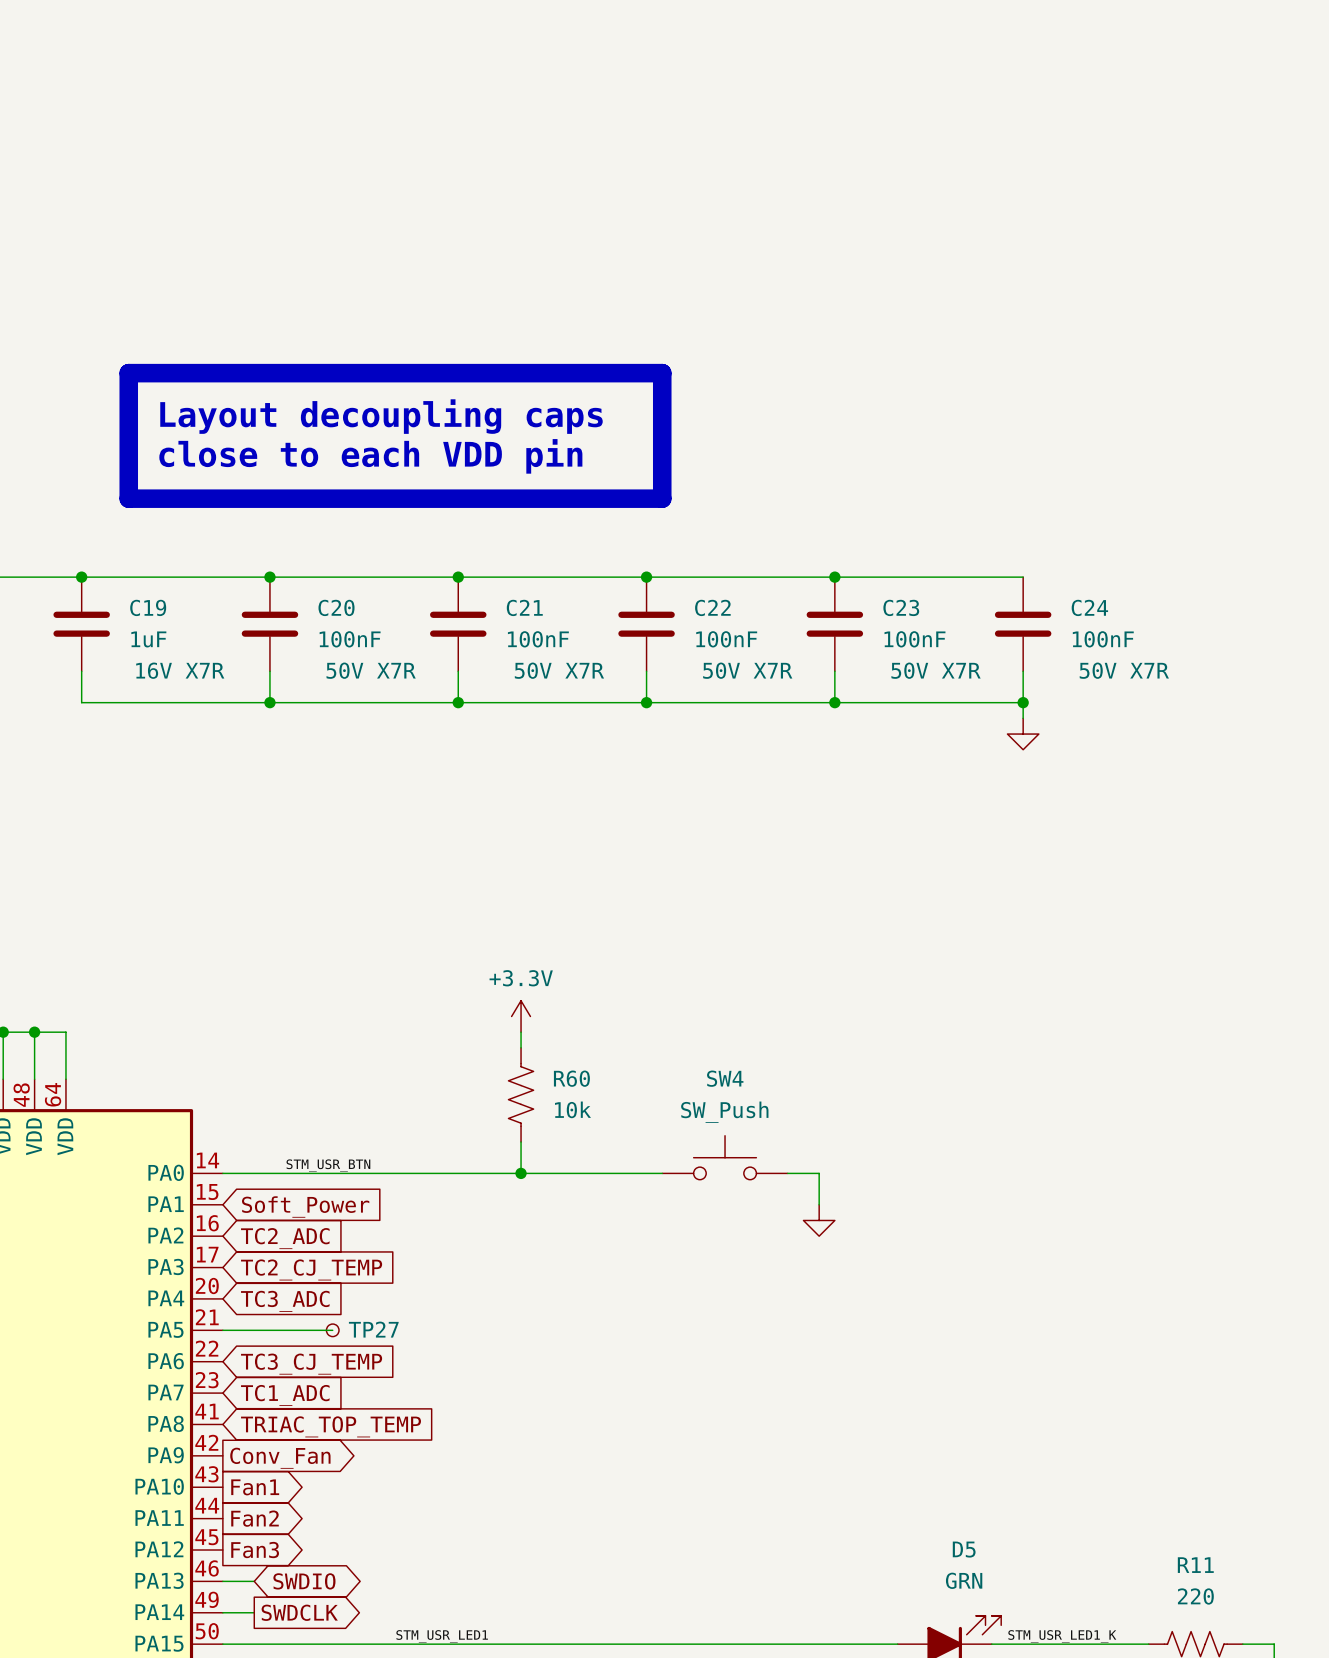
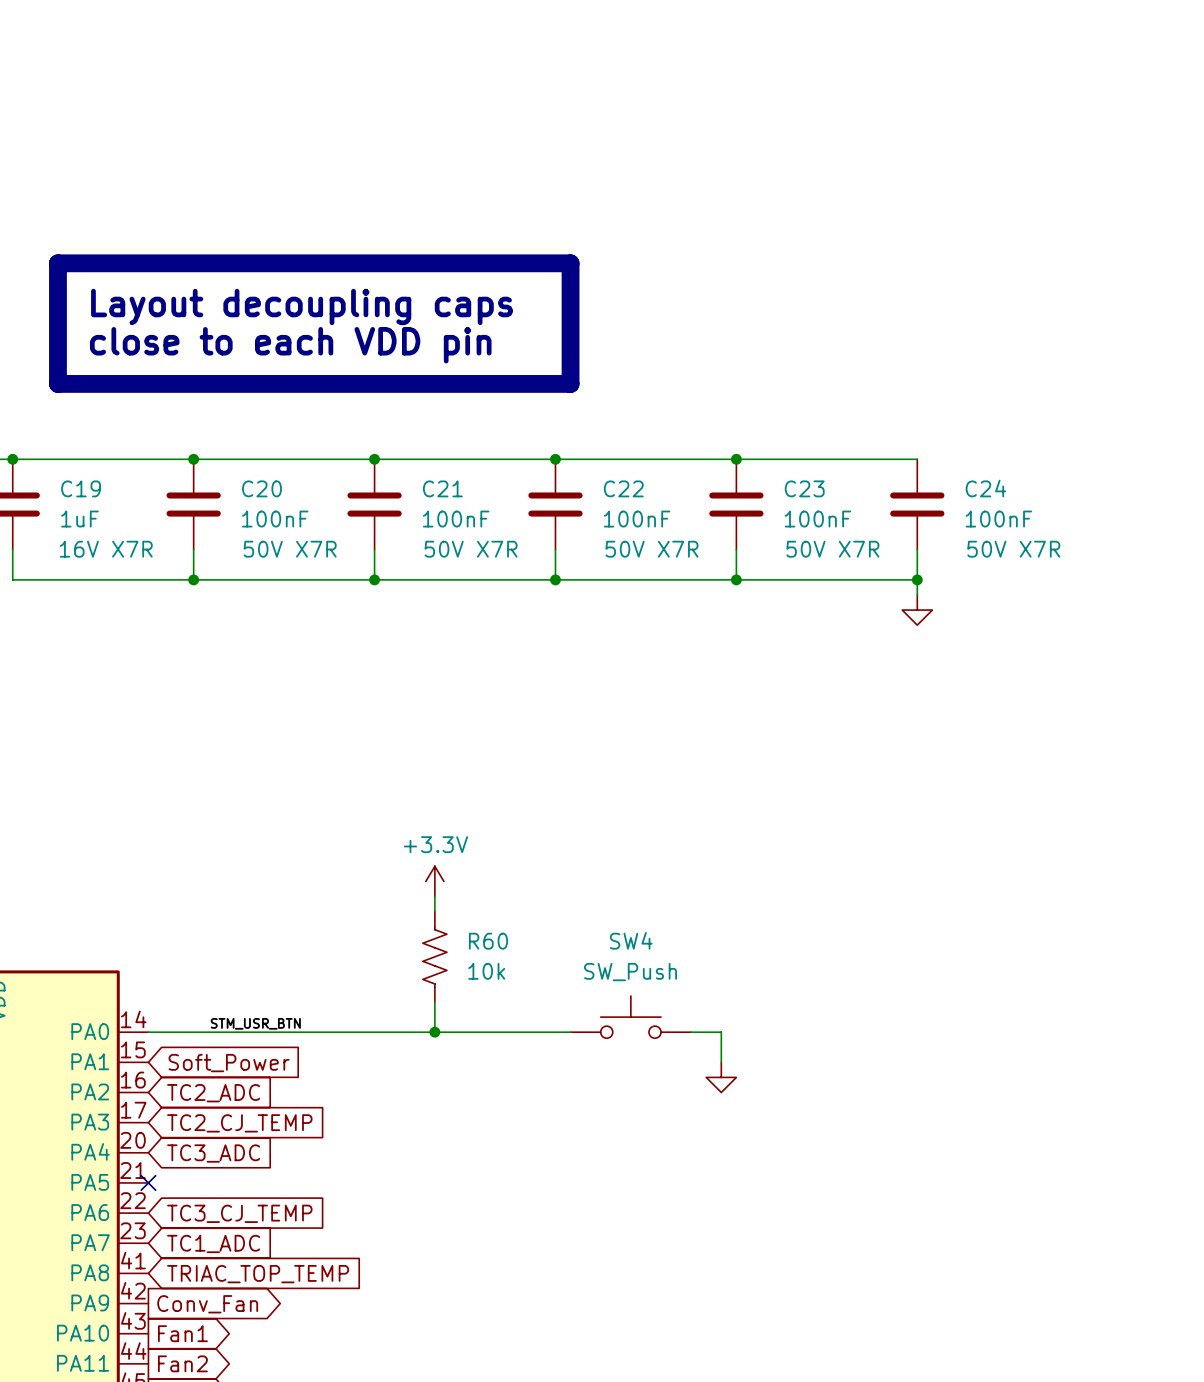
wire: (222, 1330) (332, 1330) -> none
no-connect mark: none -> (148, 1182)
TP27: (332, 1330) -> none

